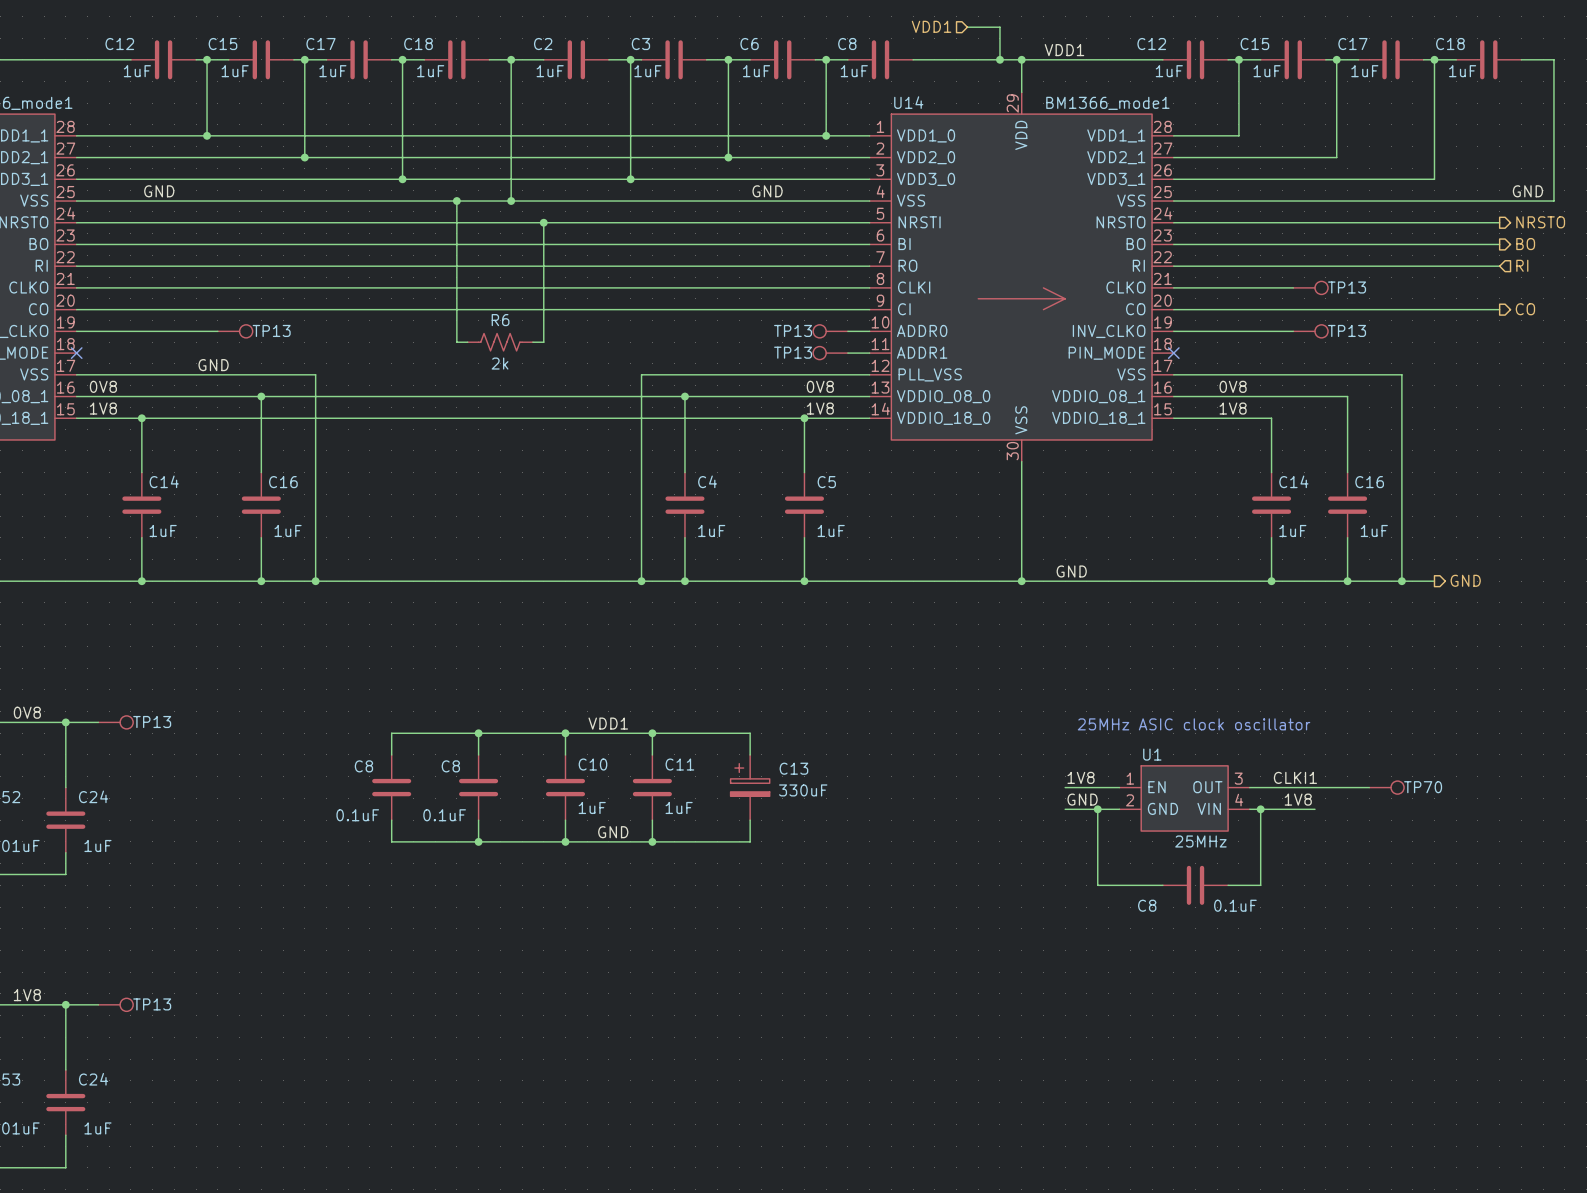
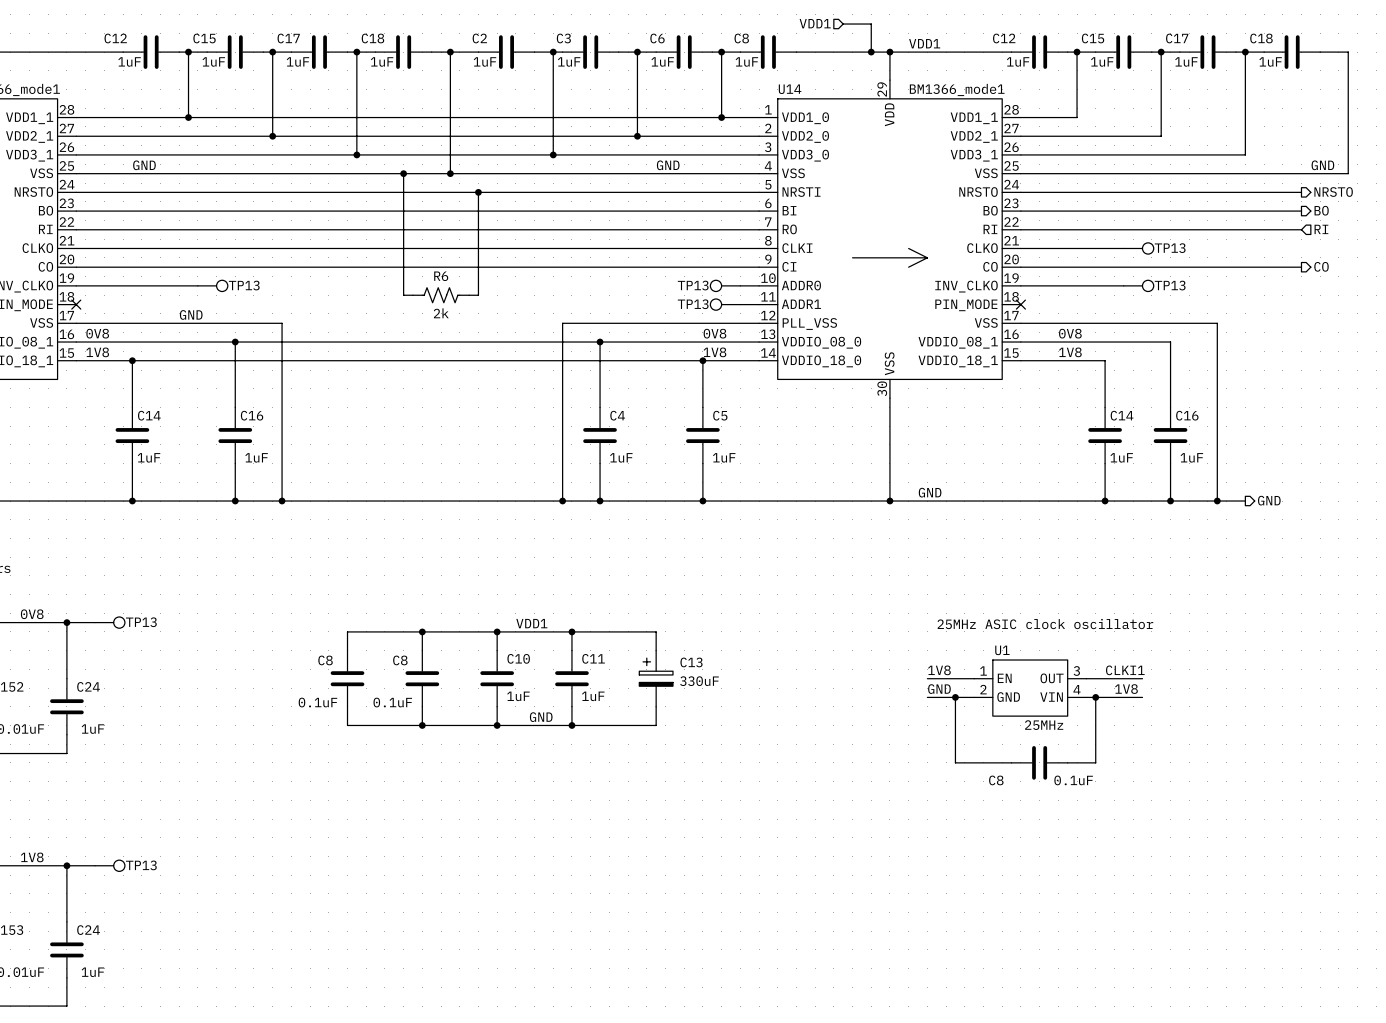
wire: (1314, 787) (1369, 787) -> none
TP70: (1386, 787) -> none

